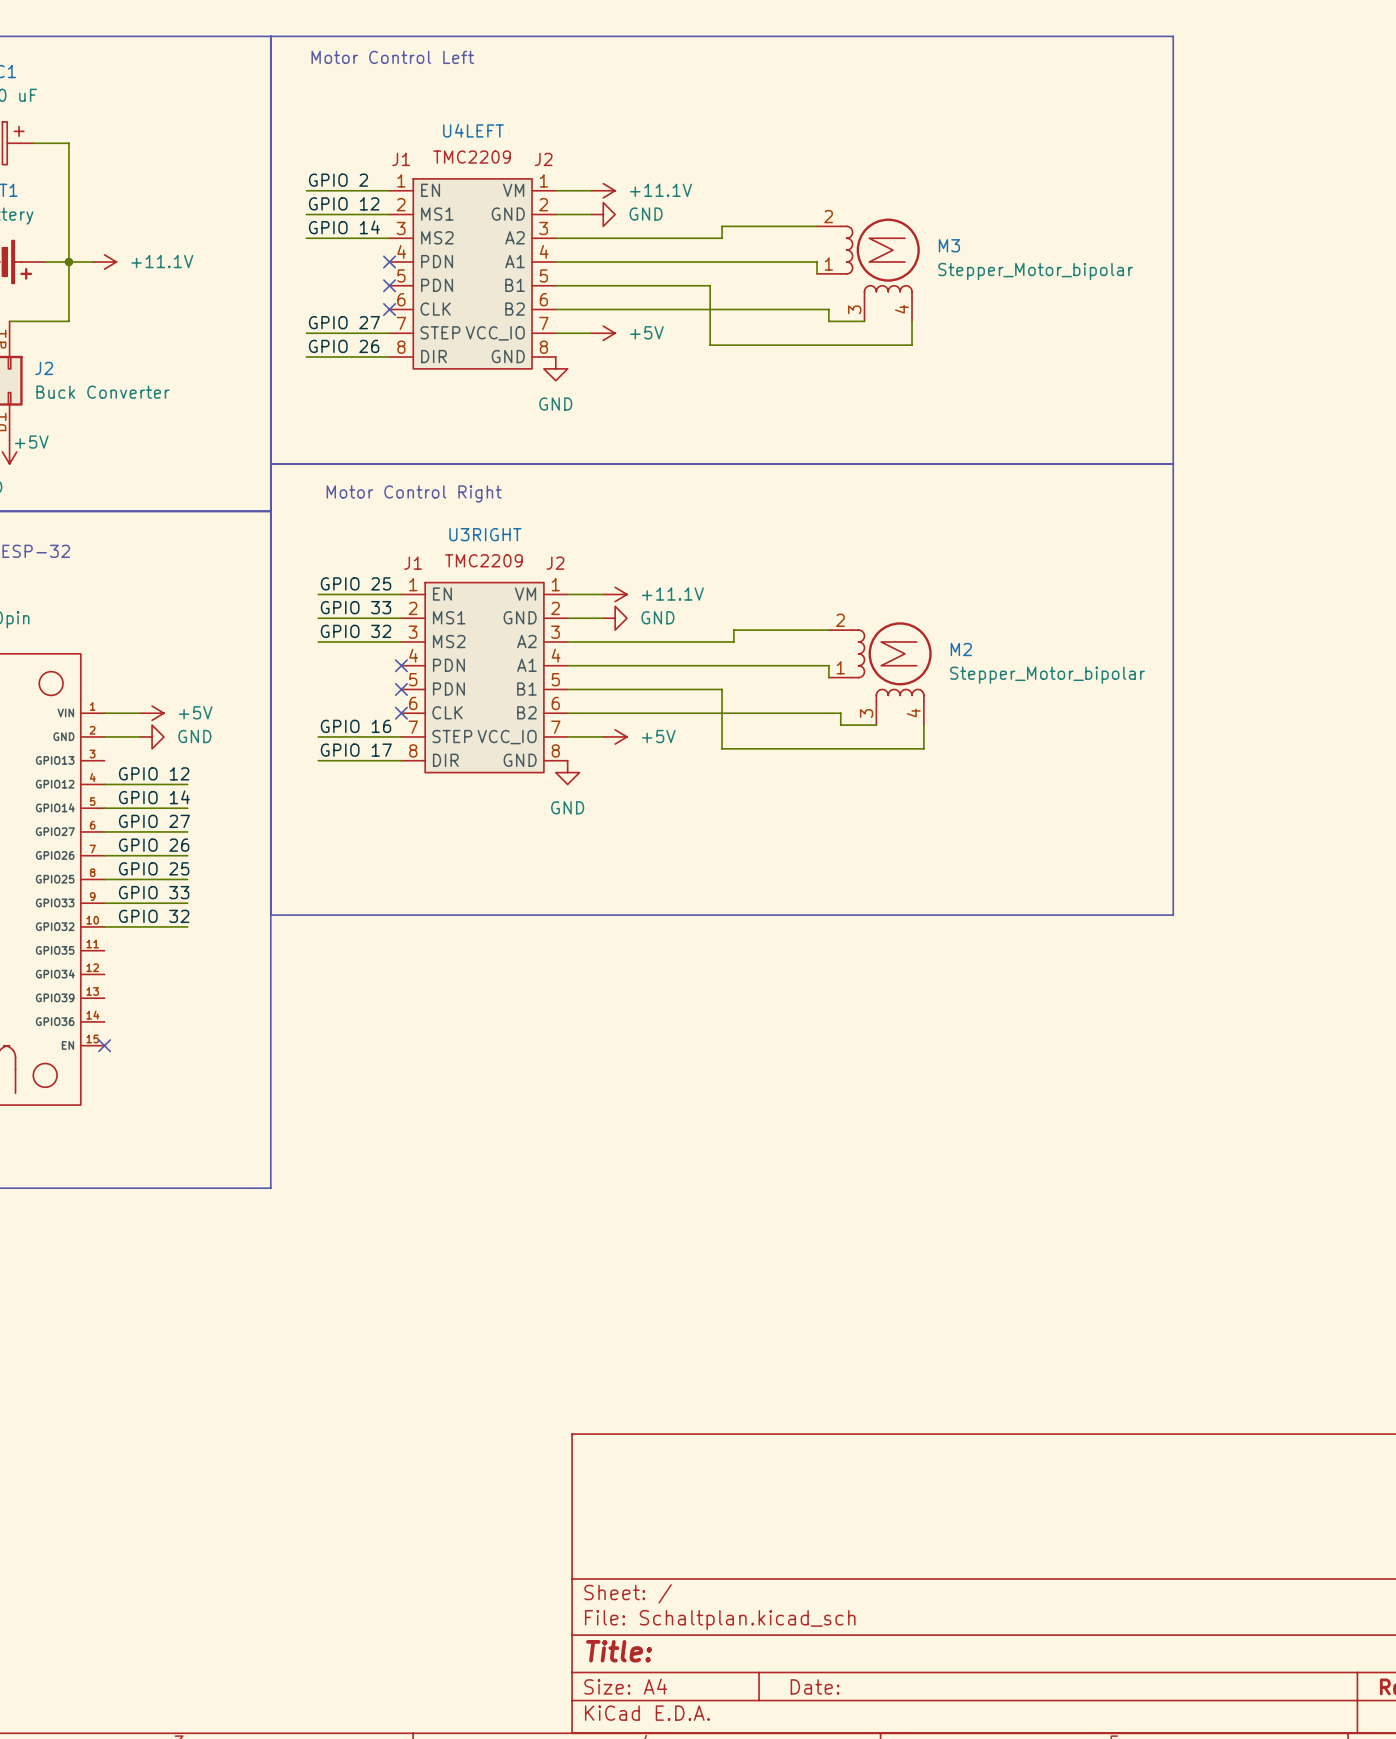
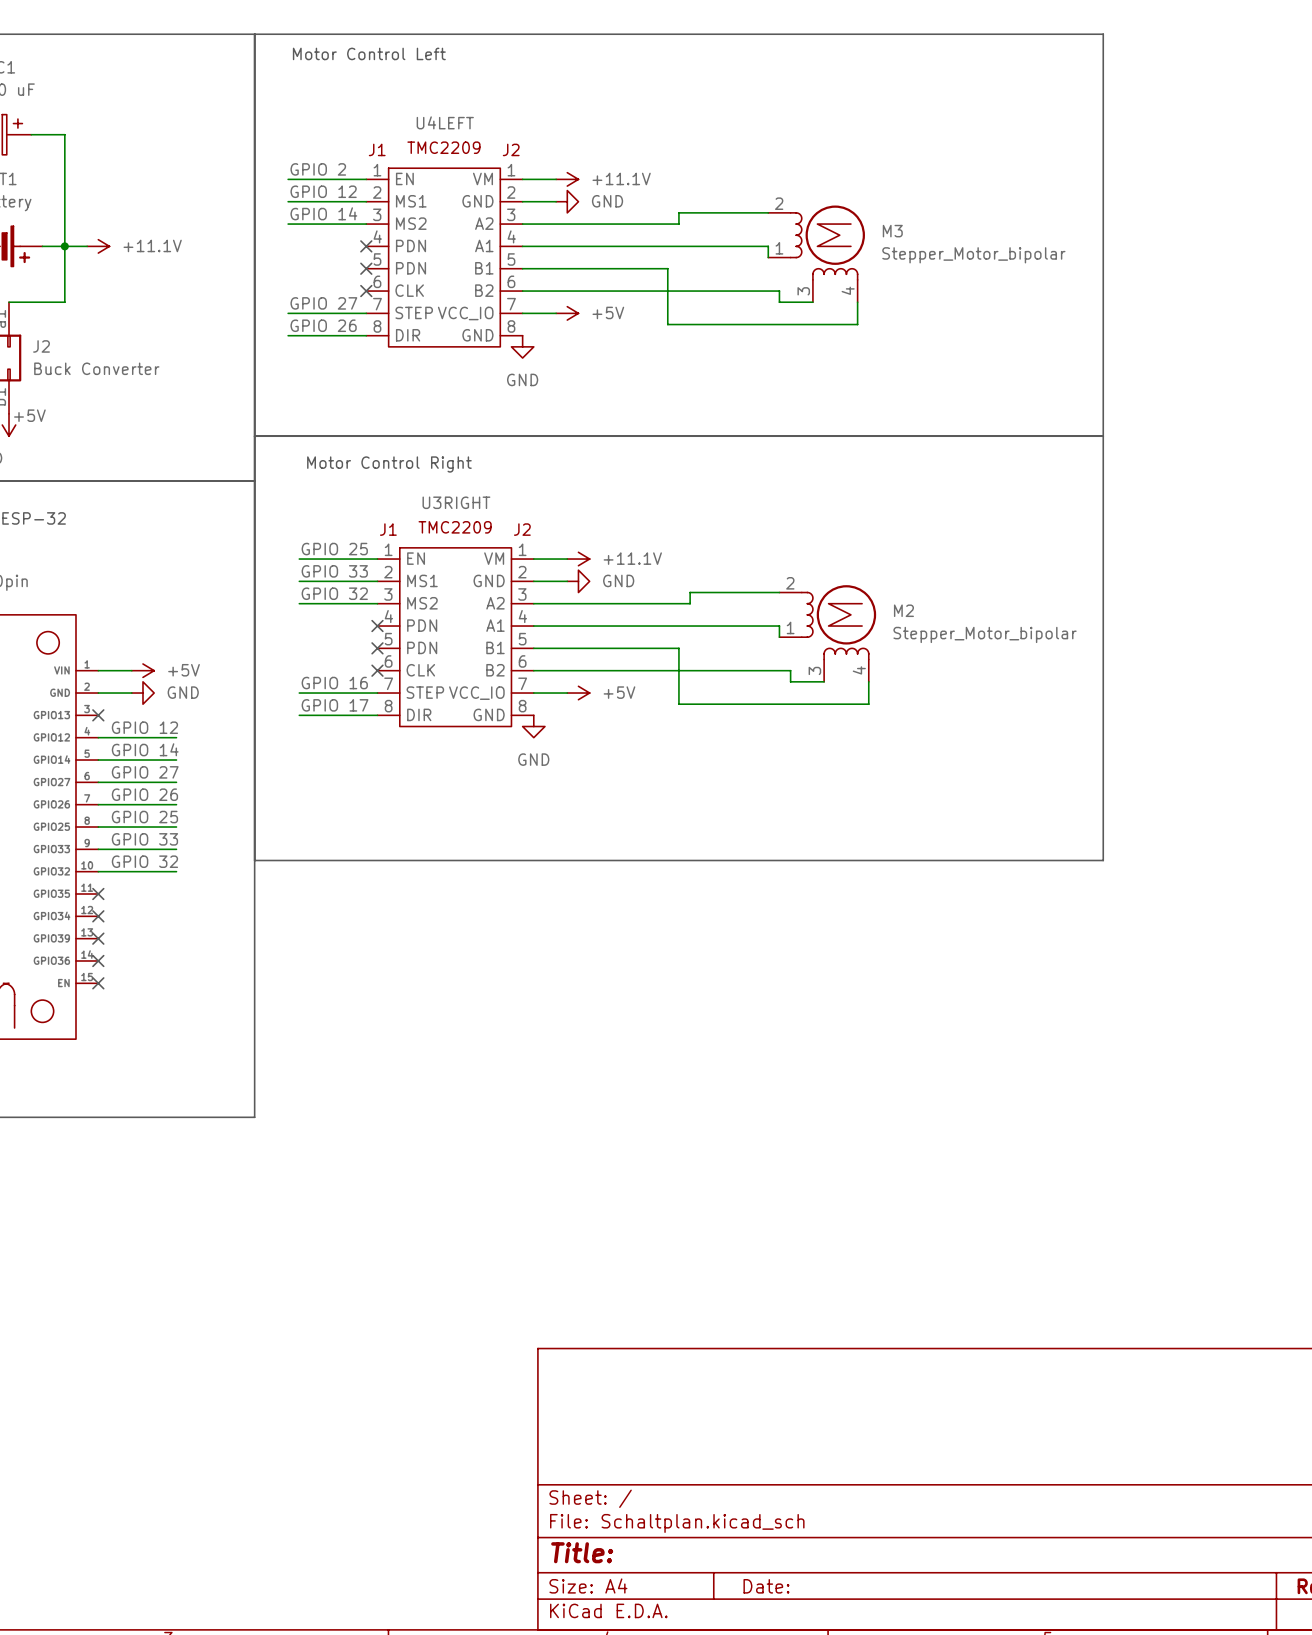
no-connect mark: none -> (98, 715)
no-connect mark: none -> (98, 894)
no-connect mark: none -> (98, 916)
no-connect mark: none -> (98, 938)
no-connect mark: none -> (98, 960)

